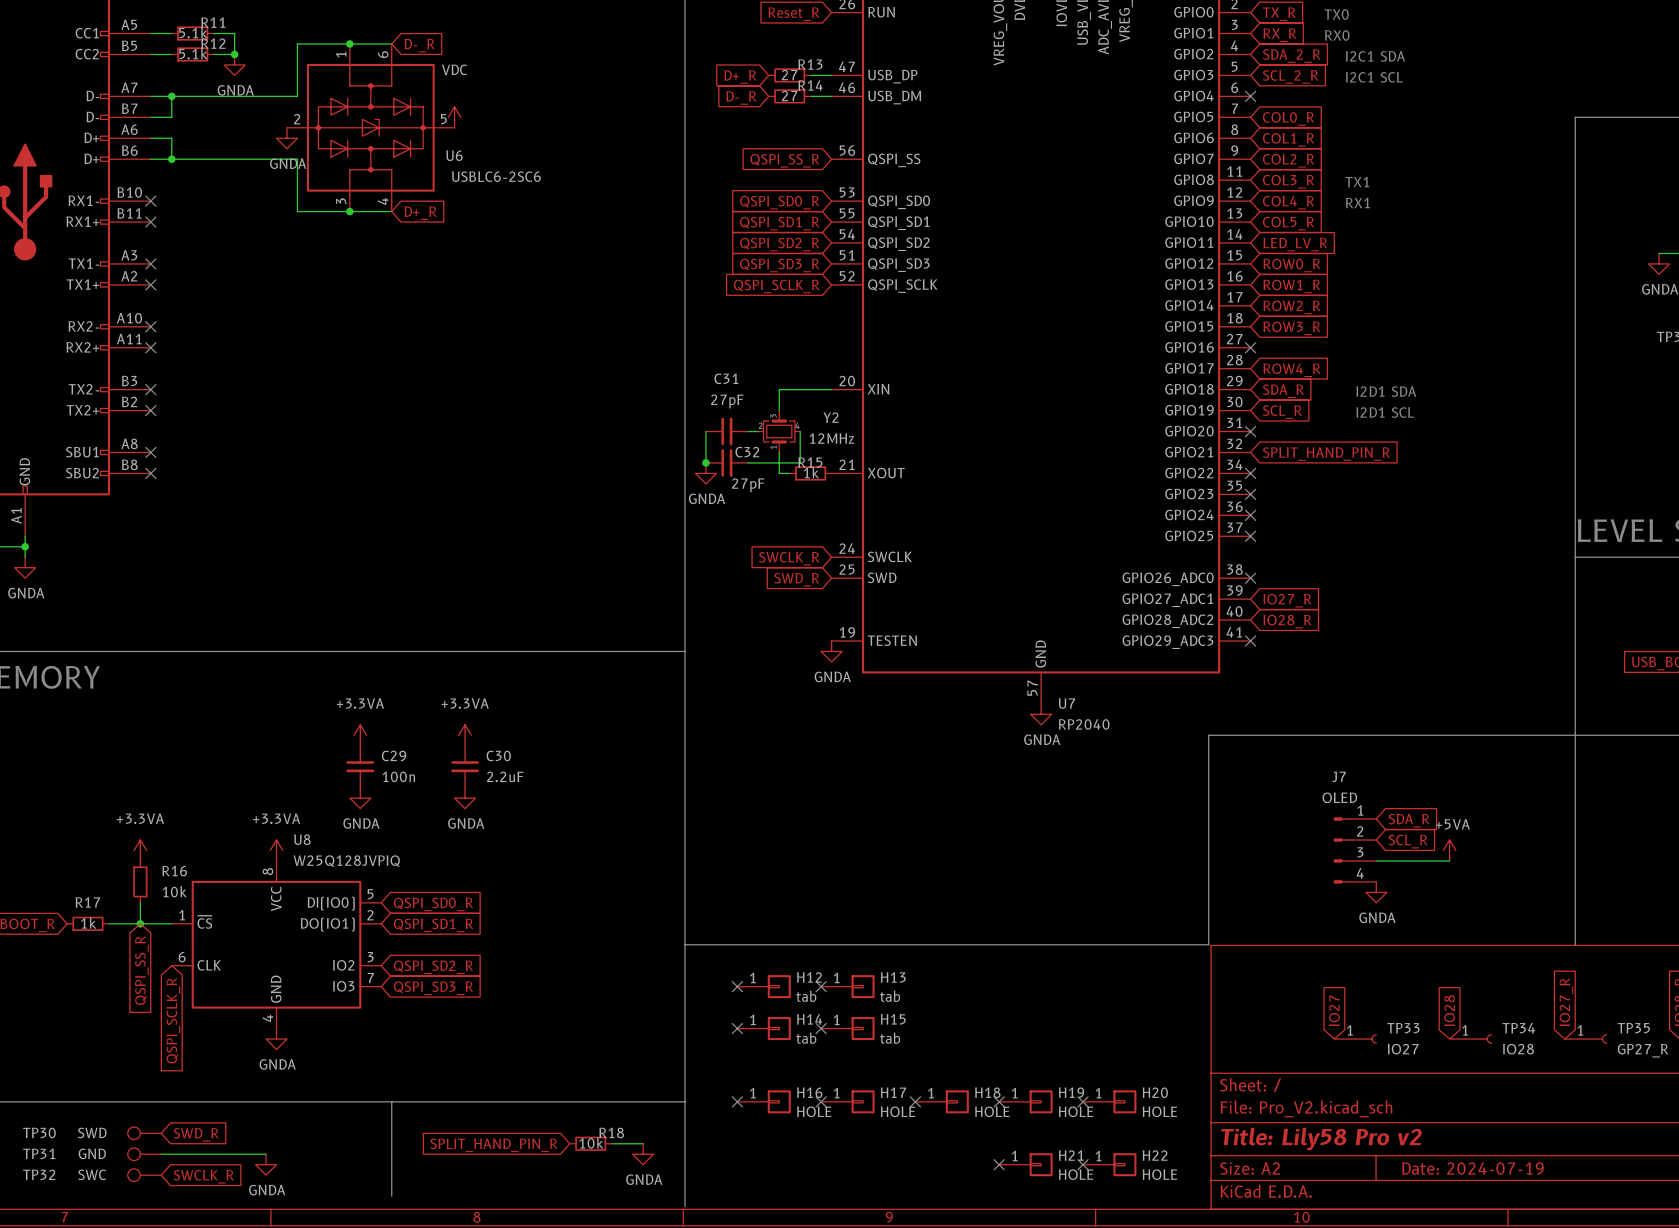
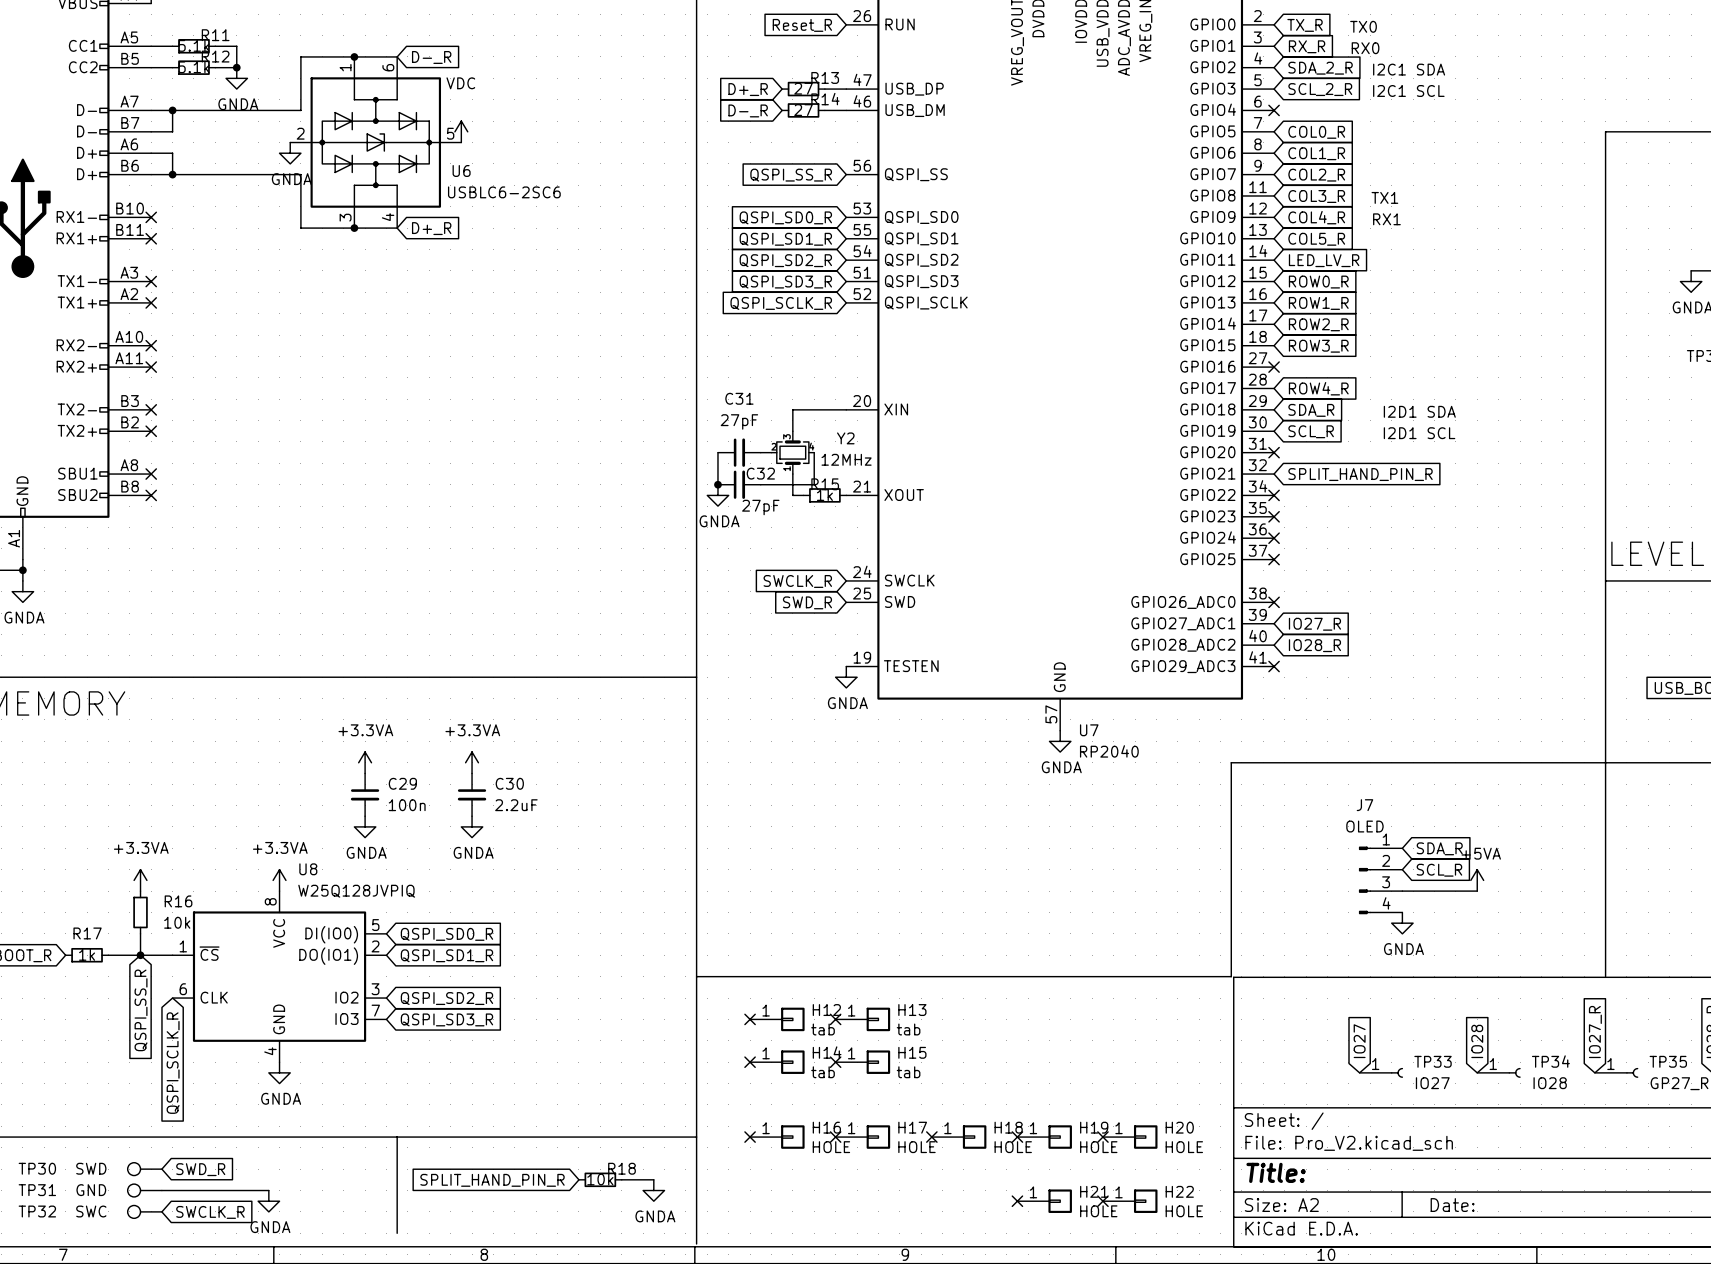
title block: Title: Lily58 Pro v2 (1321, 1138) -> Title: (1276, 1172)
title block: Date: 2024-07-19 (1472, 1168) -> Date: (1452, 1205)

